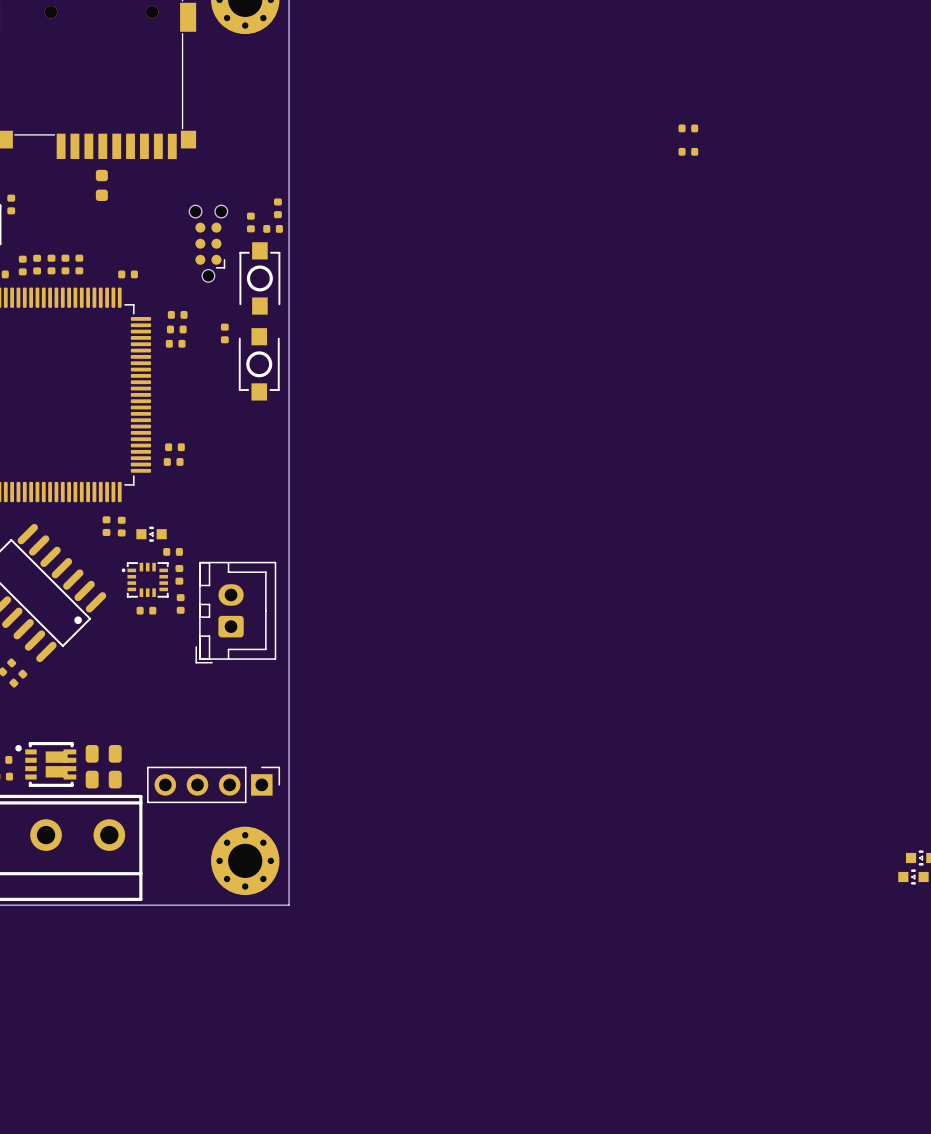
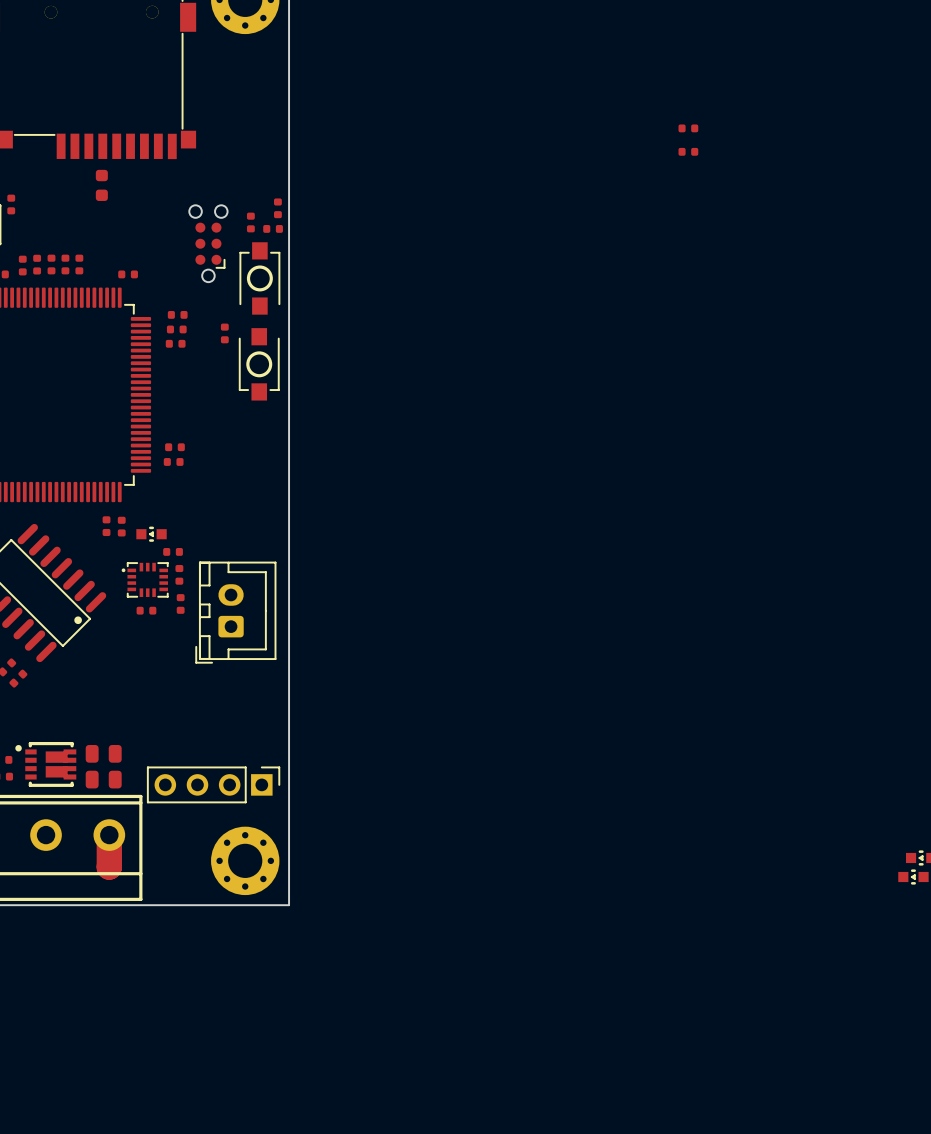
track: none -> (109, 835) (109, 867)

